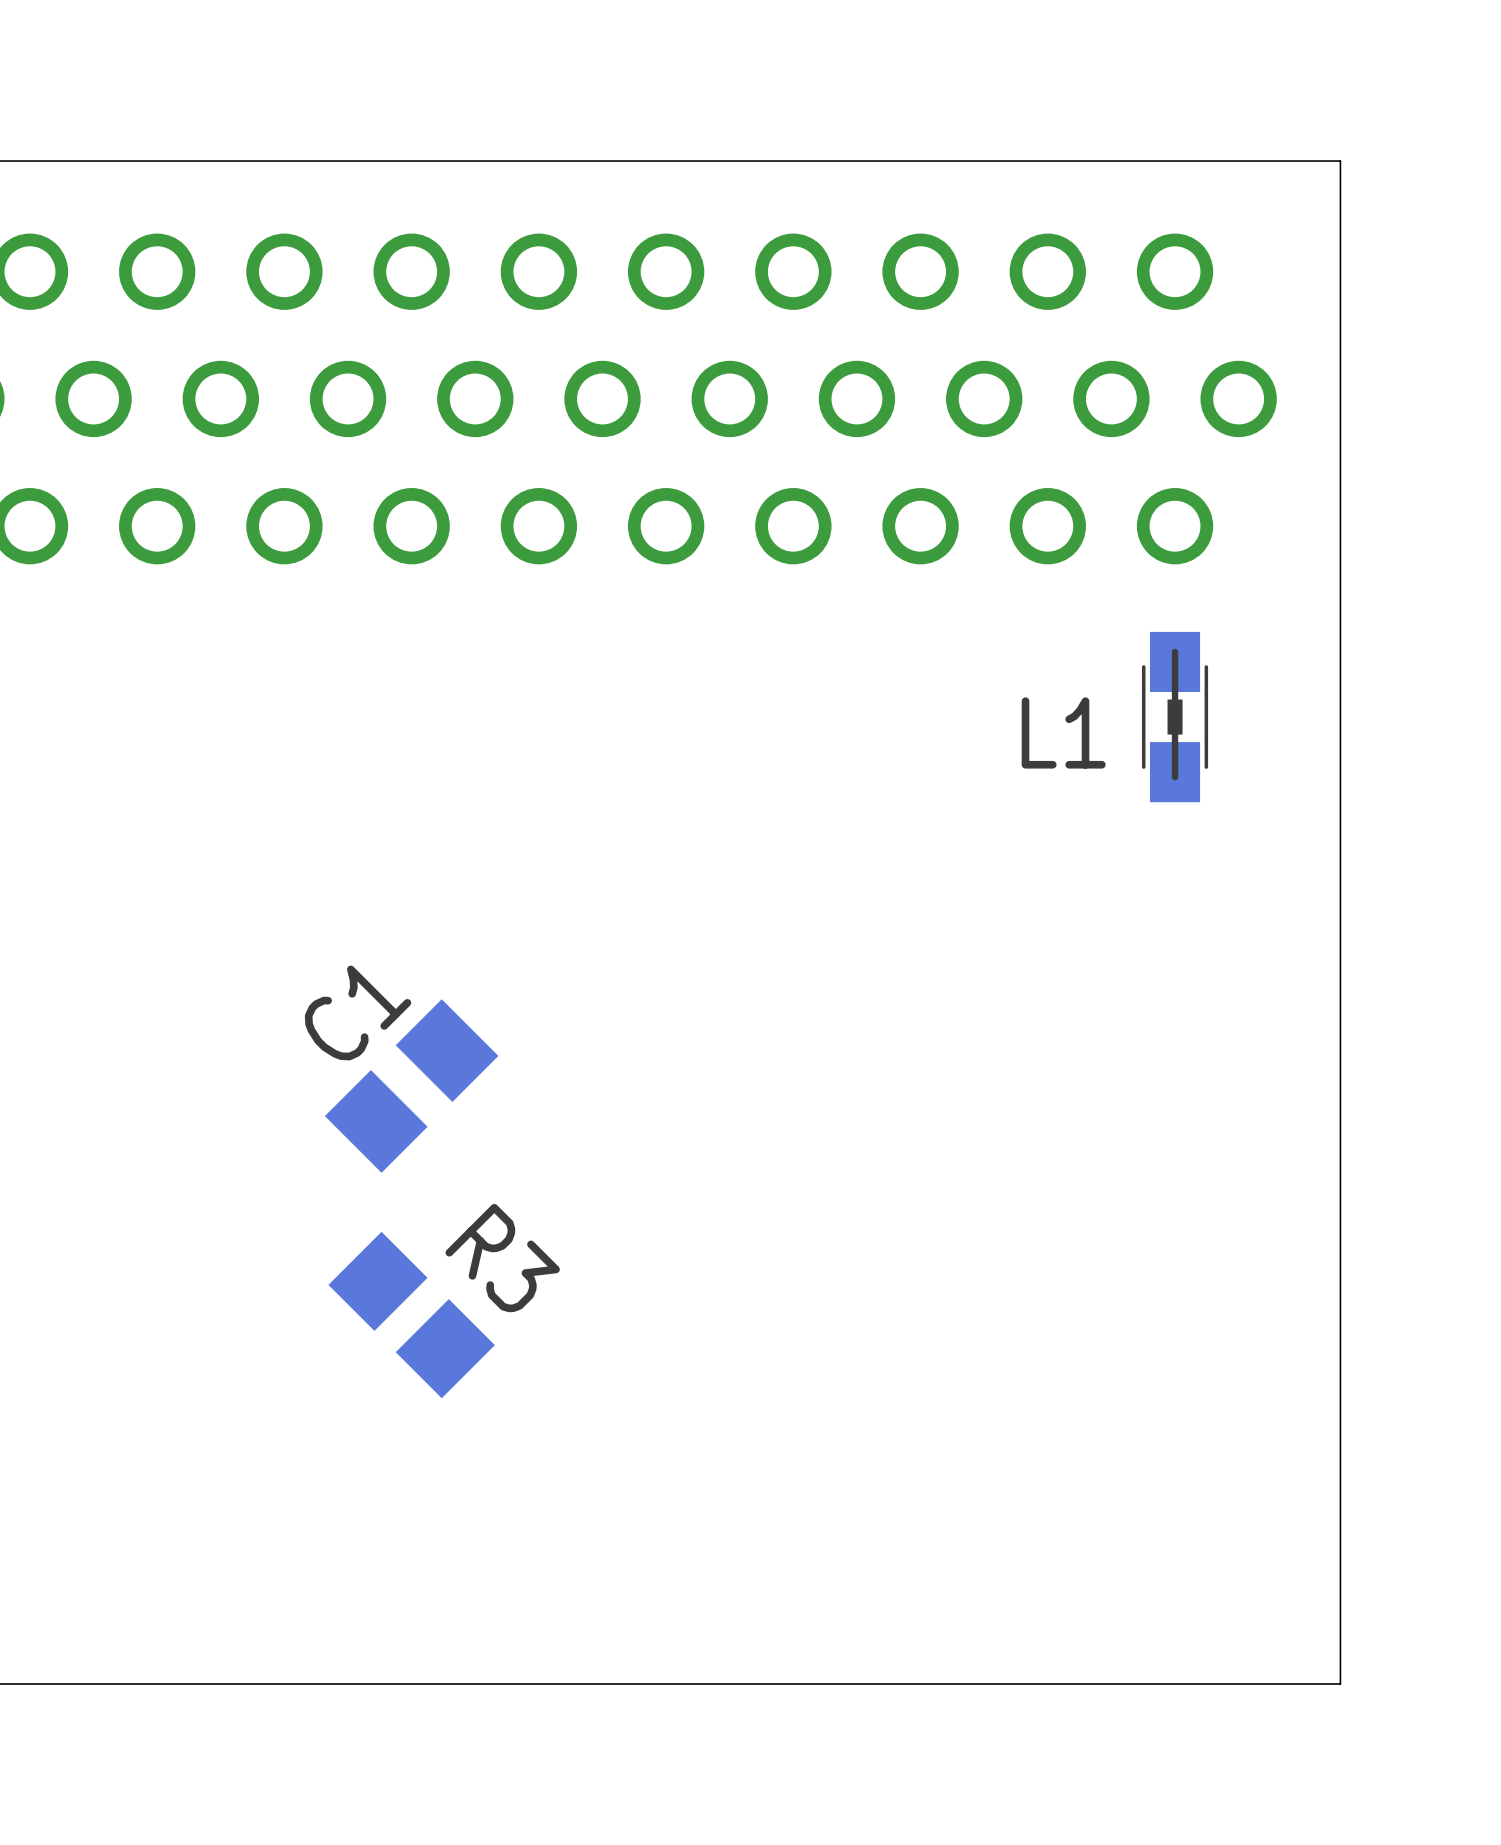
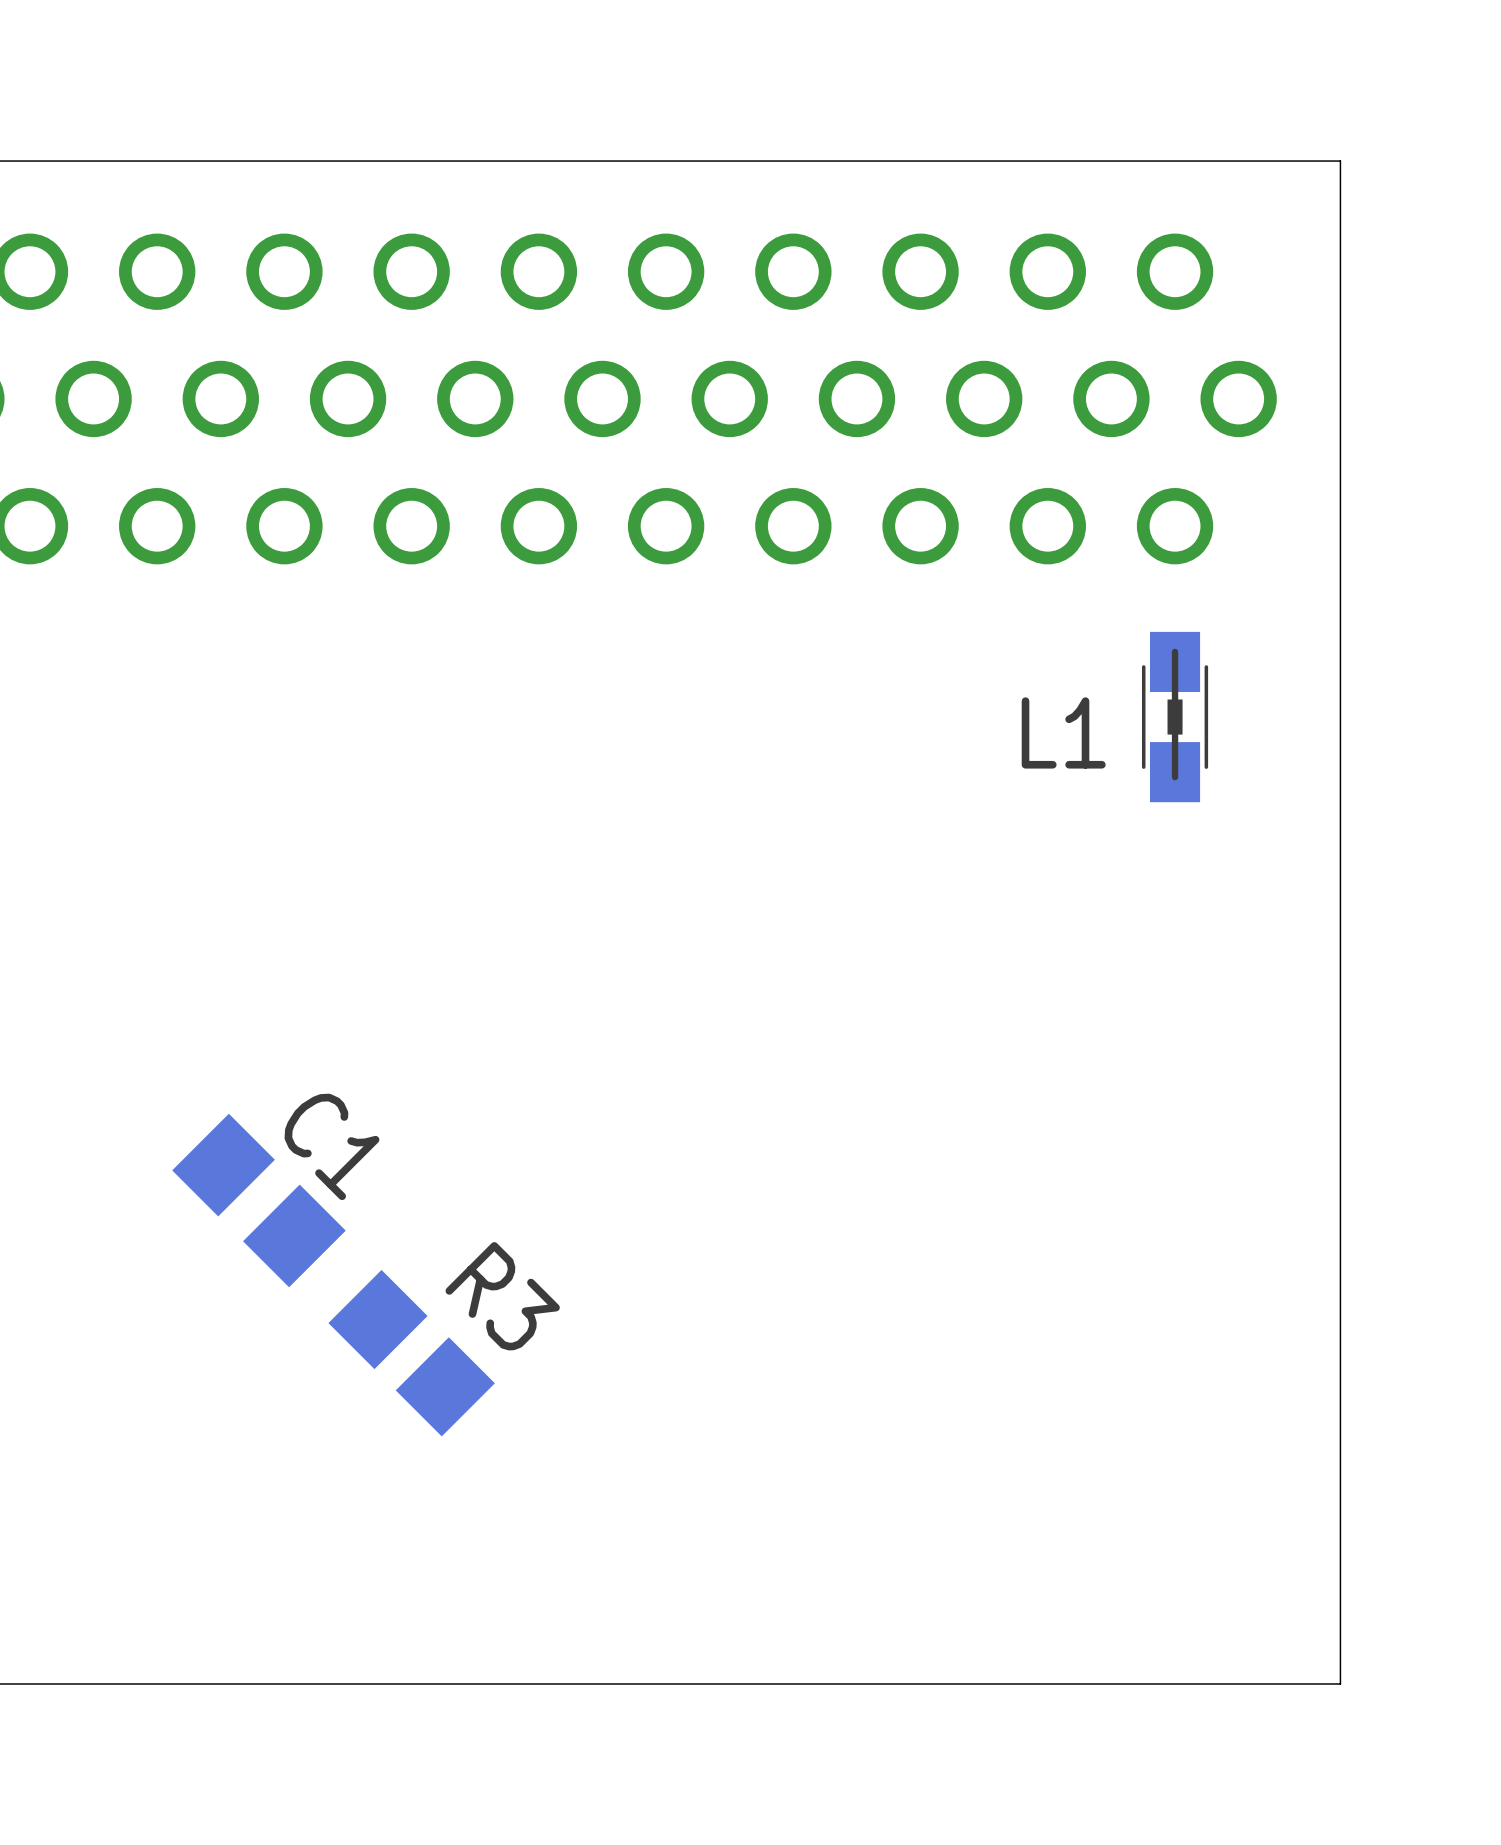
C1 rotation: 0° (411, 1086) -> 90° clockwise (258, 1200)
C1 position: (411, 1086) -> (258, 1200)
R3 position: (411, 1315) -> (411, 1353)

